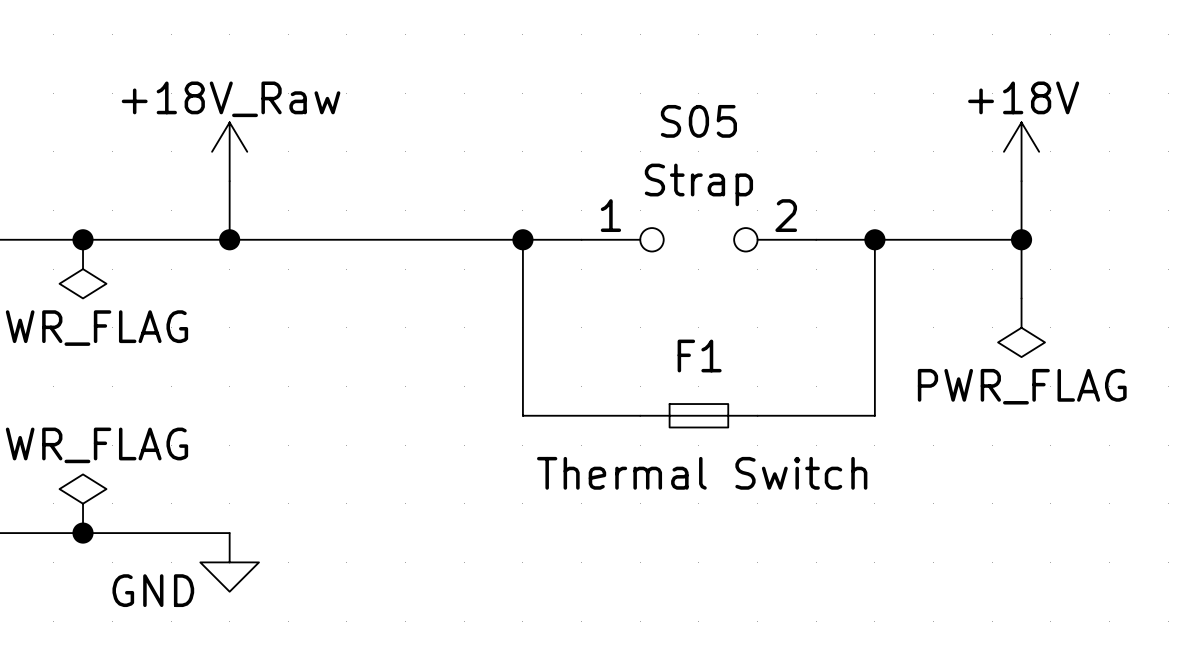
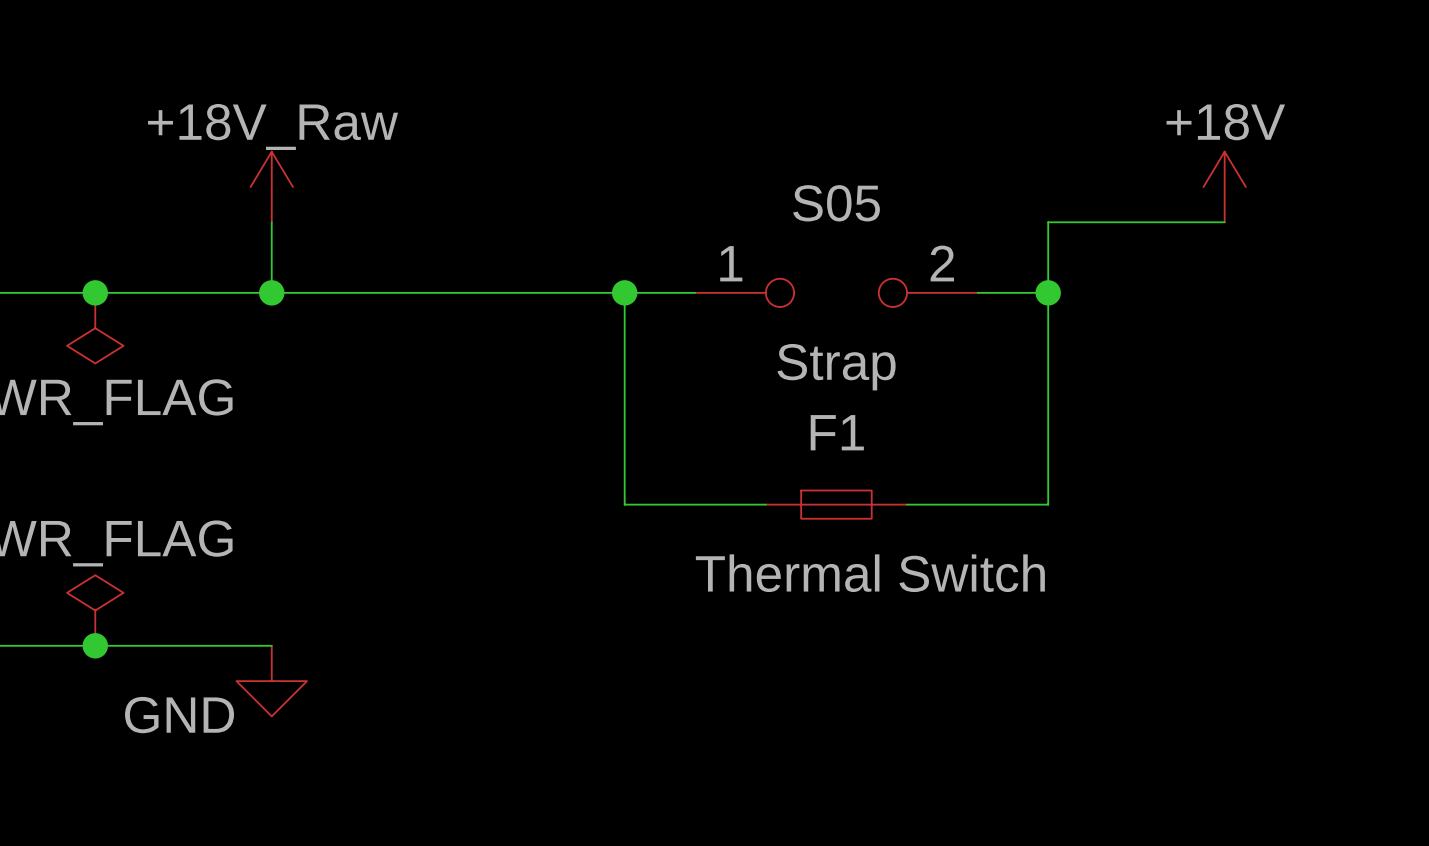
S05 name position: S05 (698, 121) -> S05 (836, 203)
wire: (1021, 181) (1021, 298) -> none
S05 value position: Strap (698, 184) -> Strap (836, 367)
wire: (874, 239) (1021, 239) -> (1048, 292) (1048, 222) (1224, 222)
junction: (1021, 239) -> none
power symbol: PWR_FLAG (1021, 327) -> none

